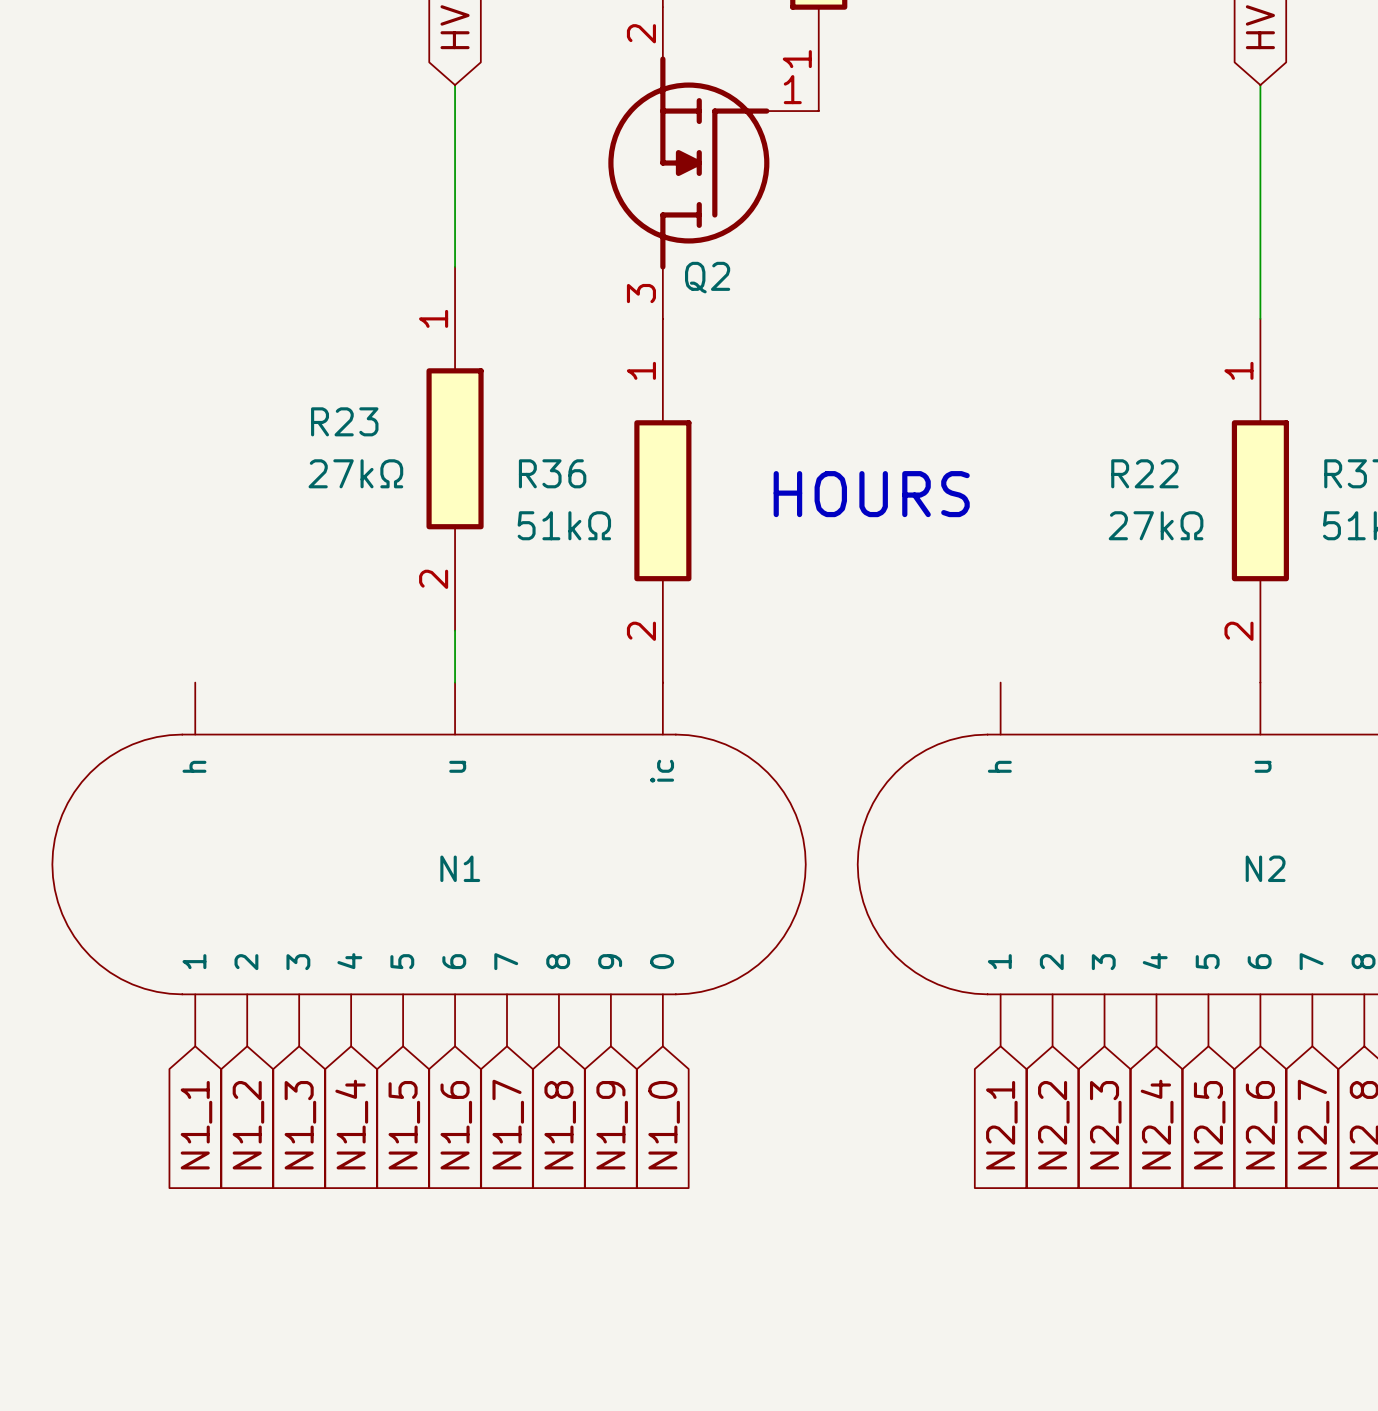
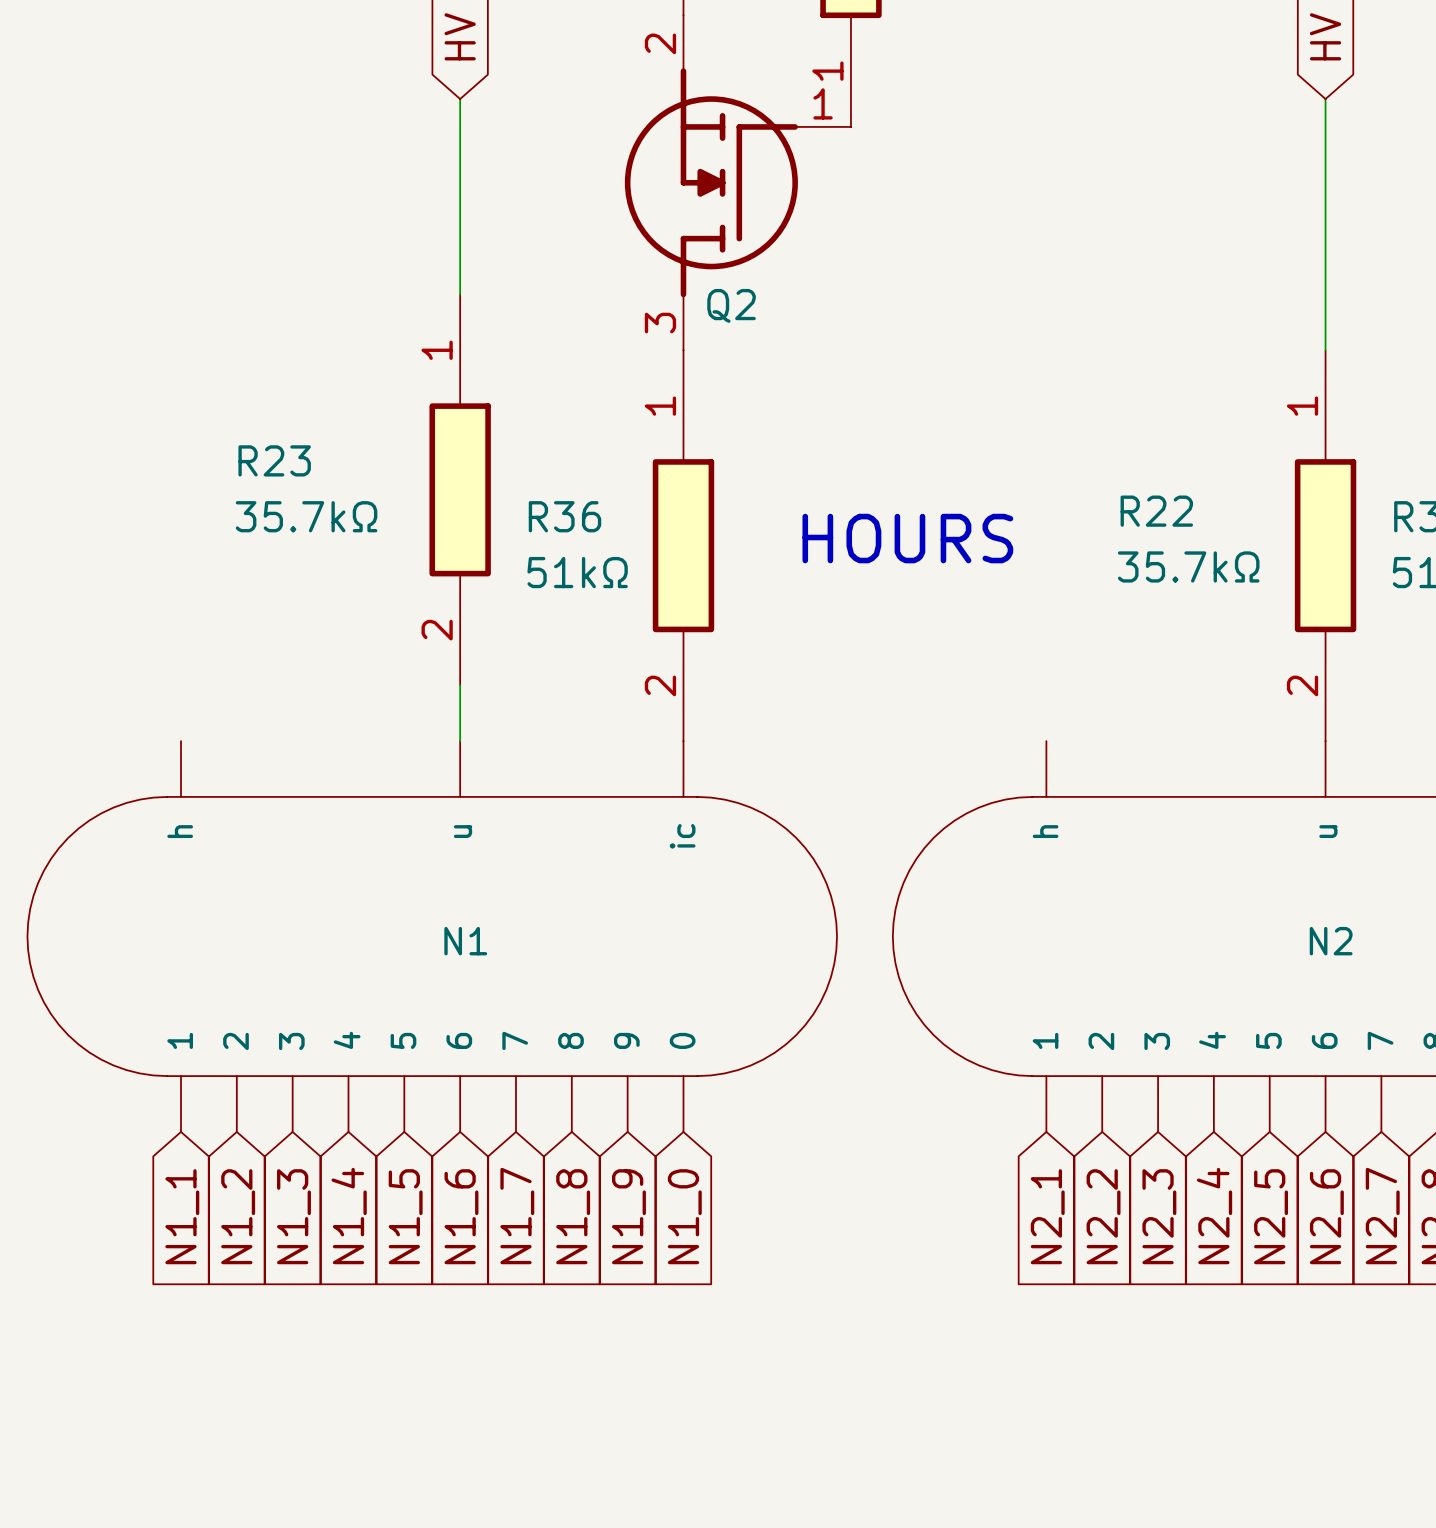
R23 name position: R23 (344, 421) -> R23 (274, 460)
R23 value: 27kΩ (355, 473) -> 35.7kΩ (306, 516)
R22 name position: R22 (1144, 473) -> R22 (1156, 511)
R22 value: 27kΩ (1156, 525) -> 35.7kΩ (1188, 566)

